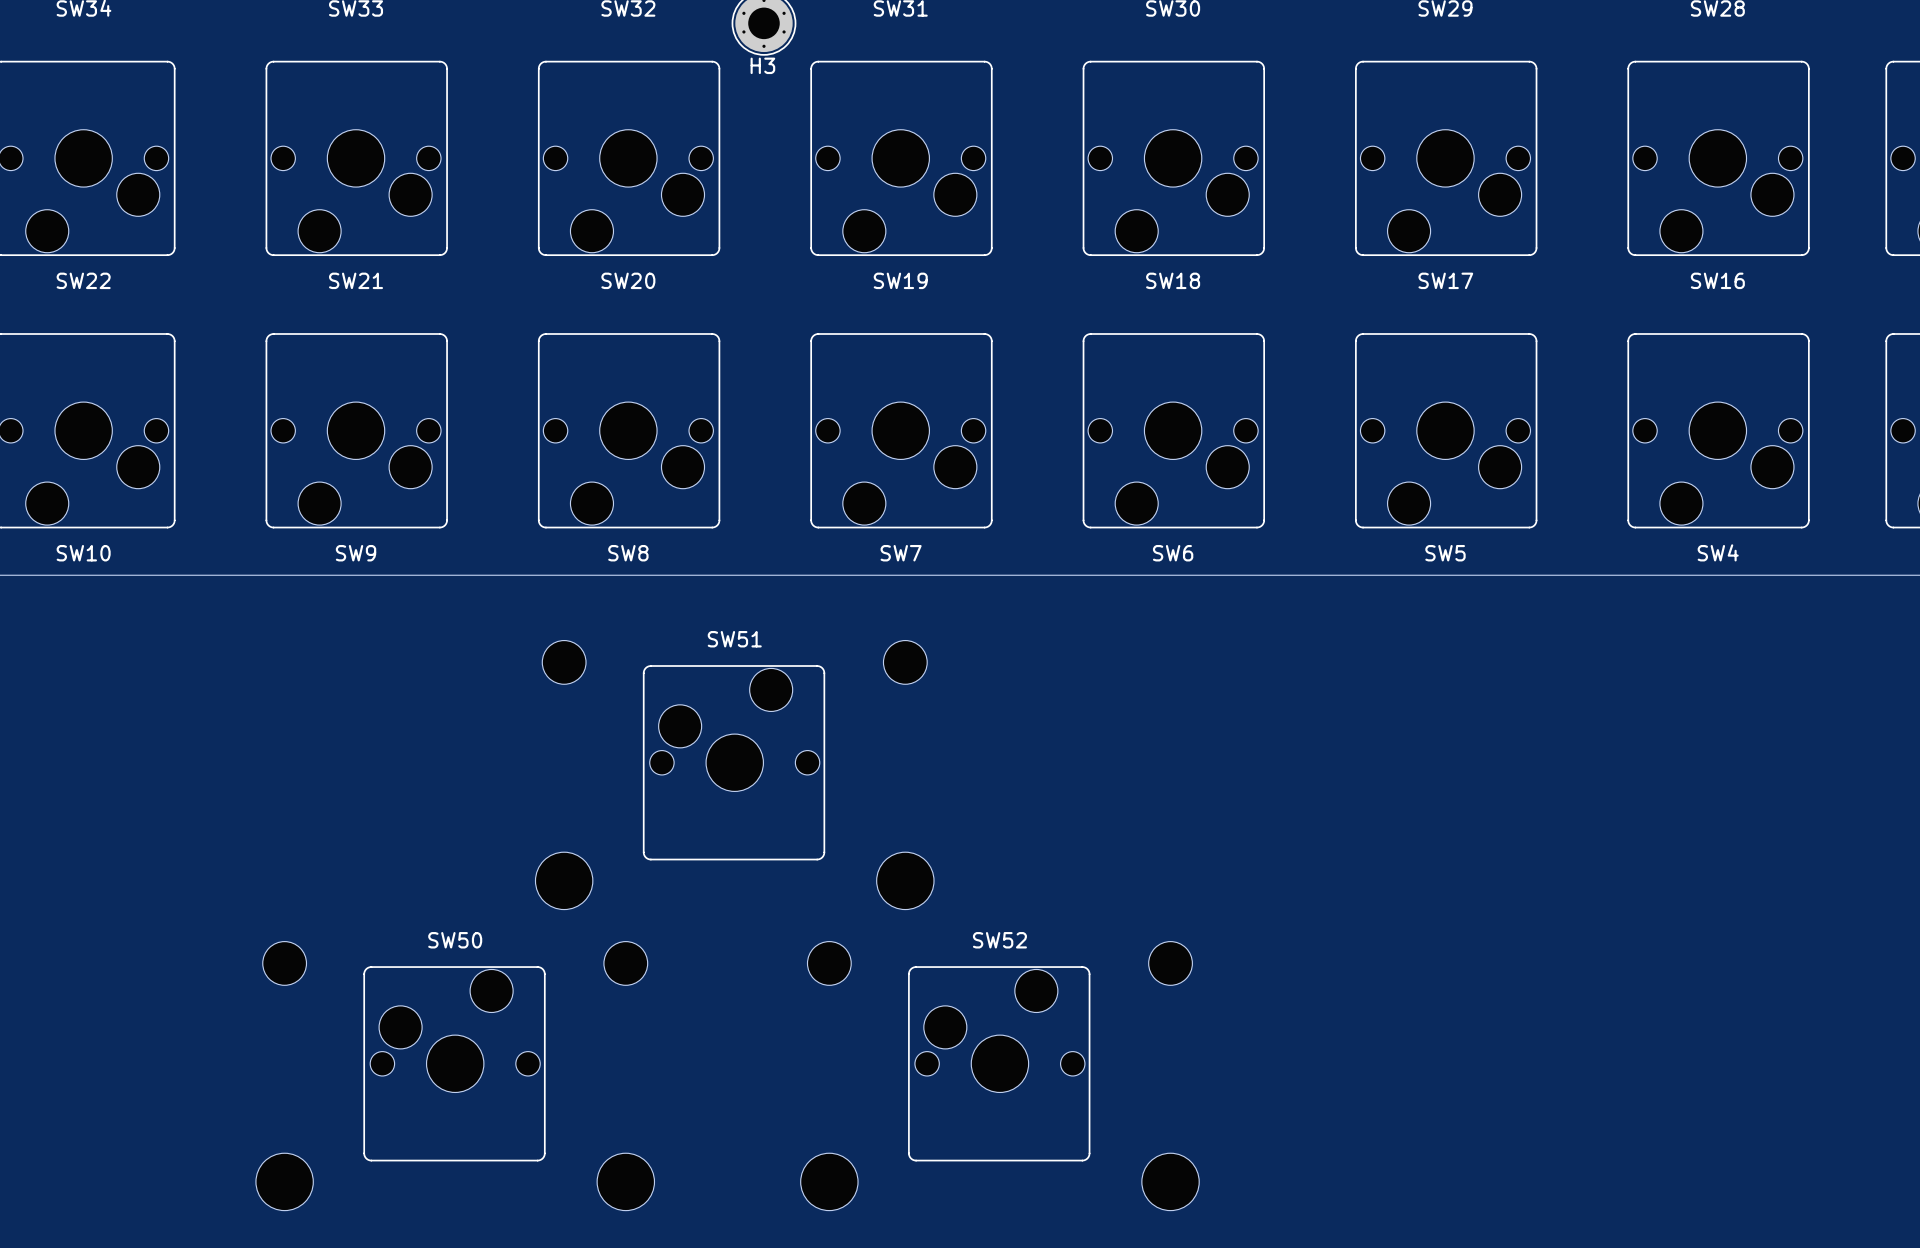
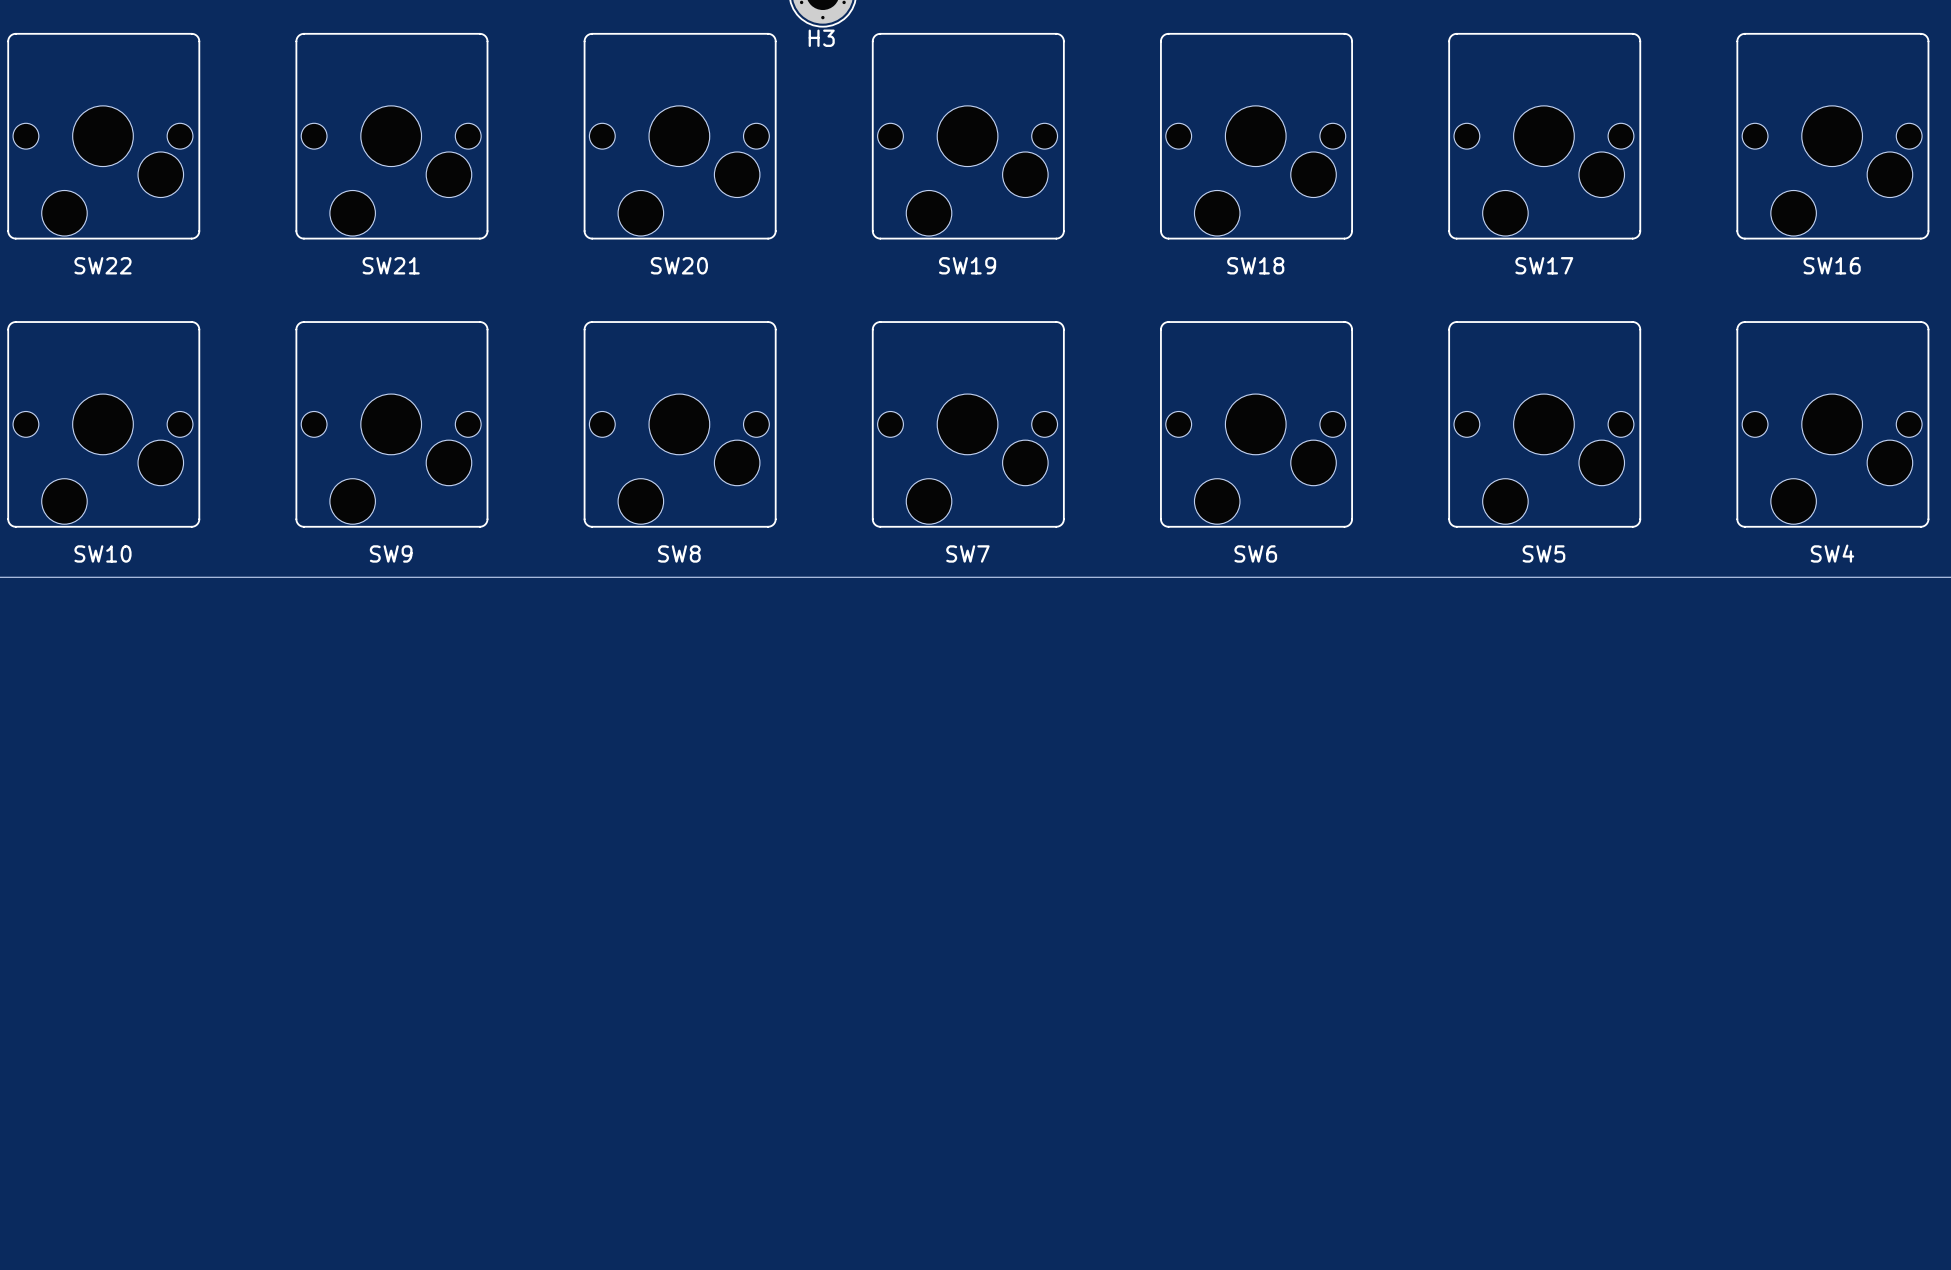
SW51: (734, 775) -> none
SW50: (455, 1076) -> none
SW52: (999, 1076) -> none

